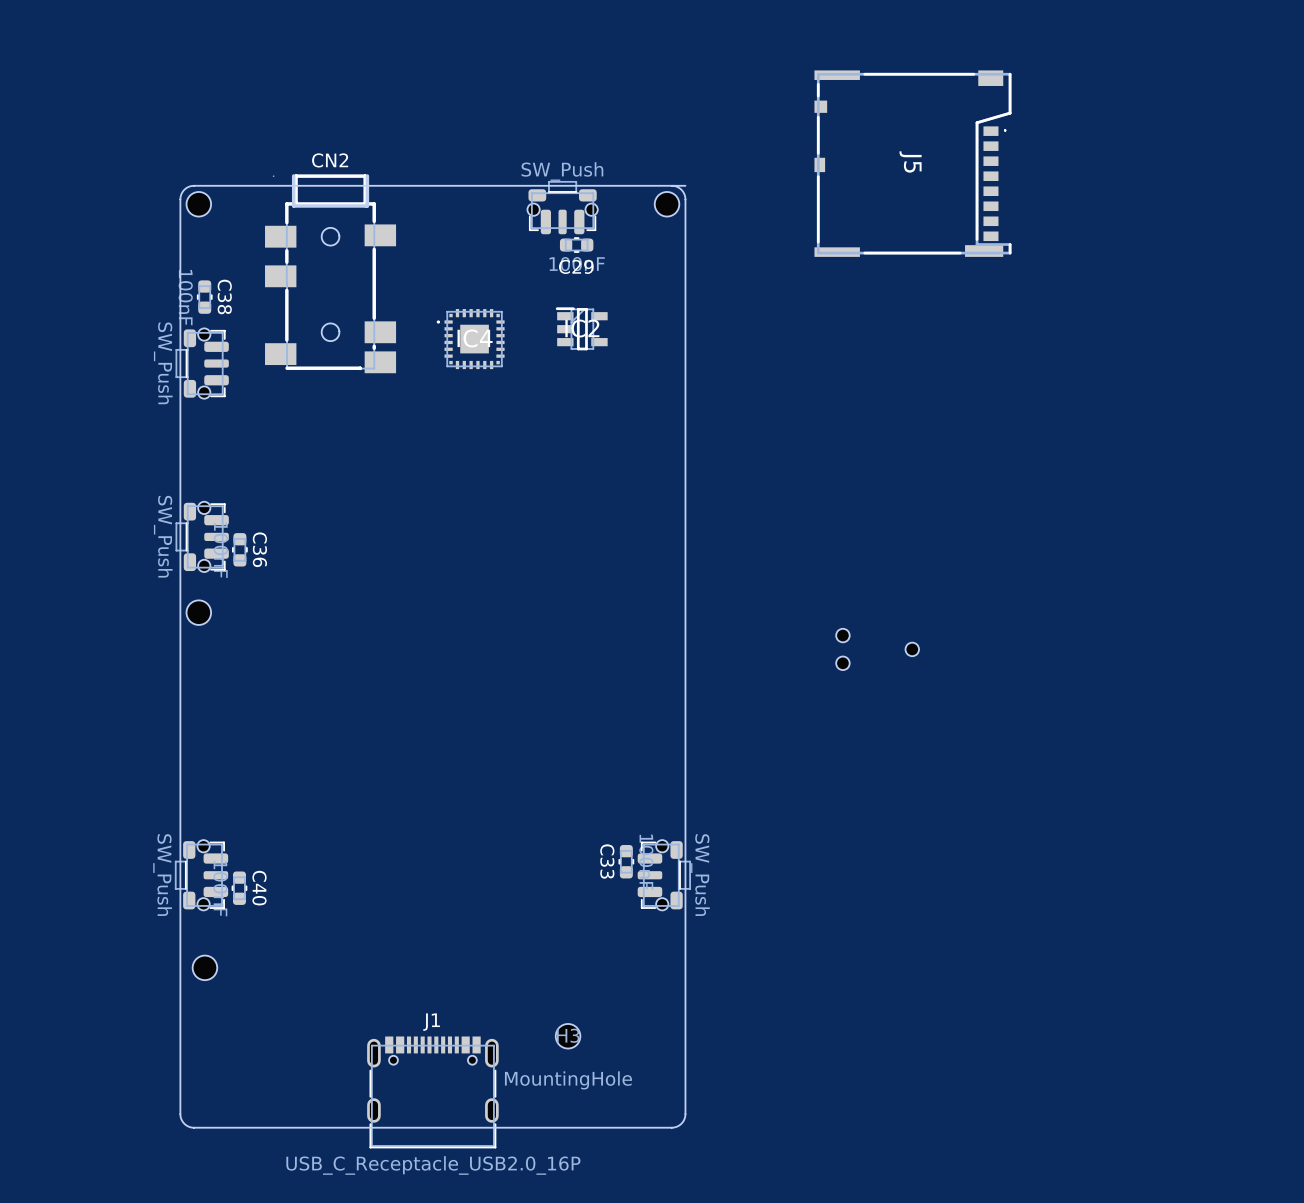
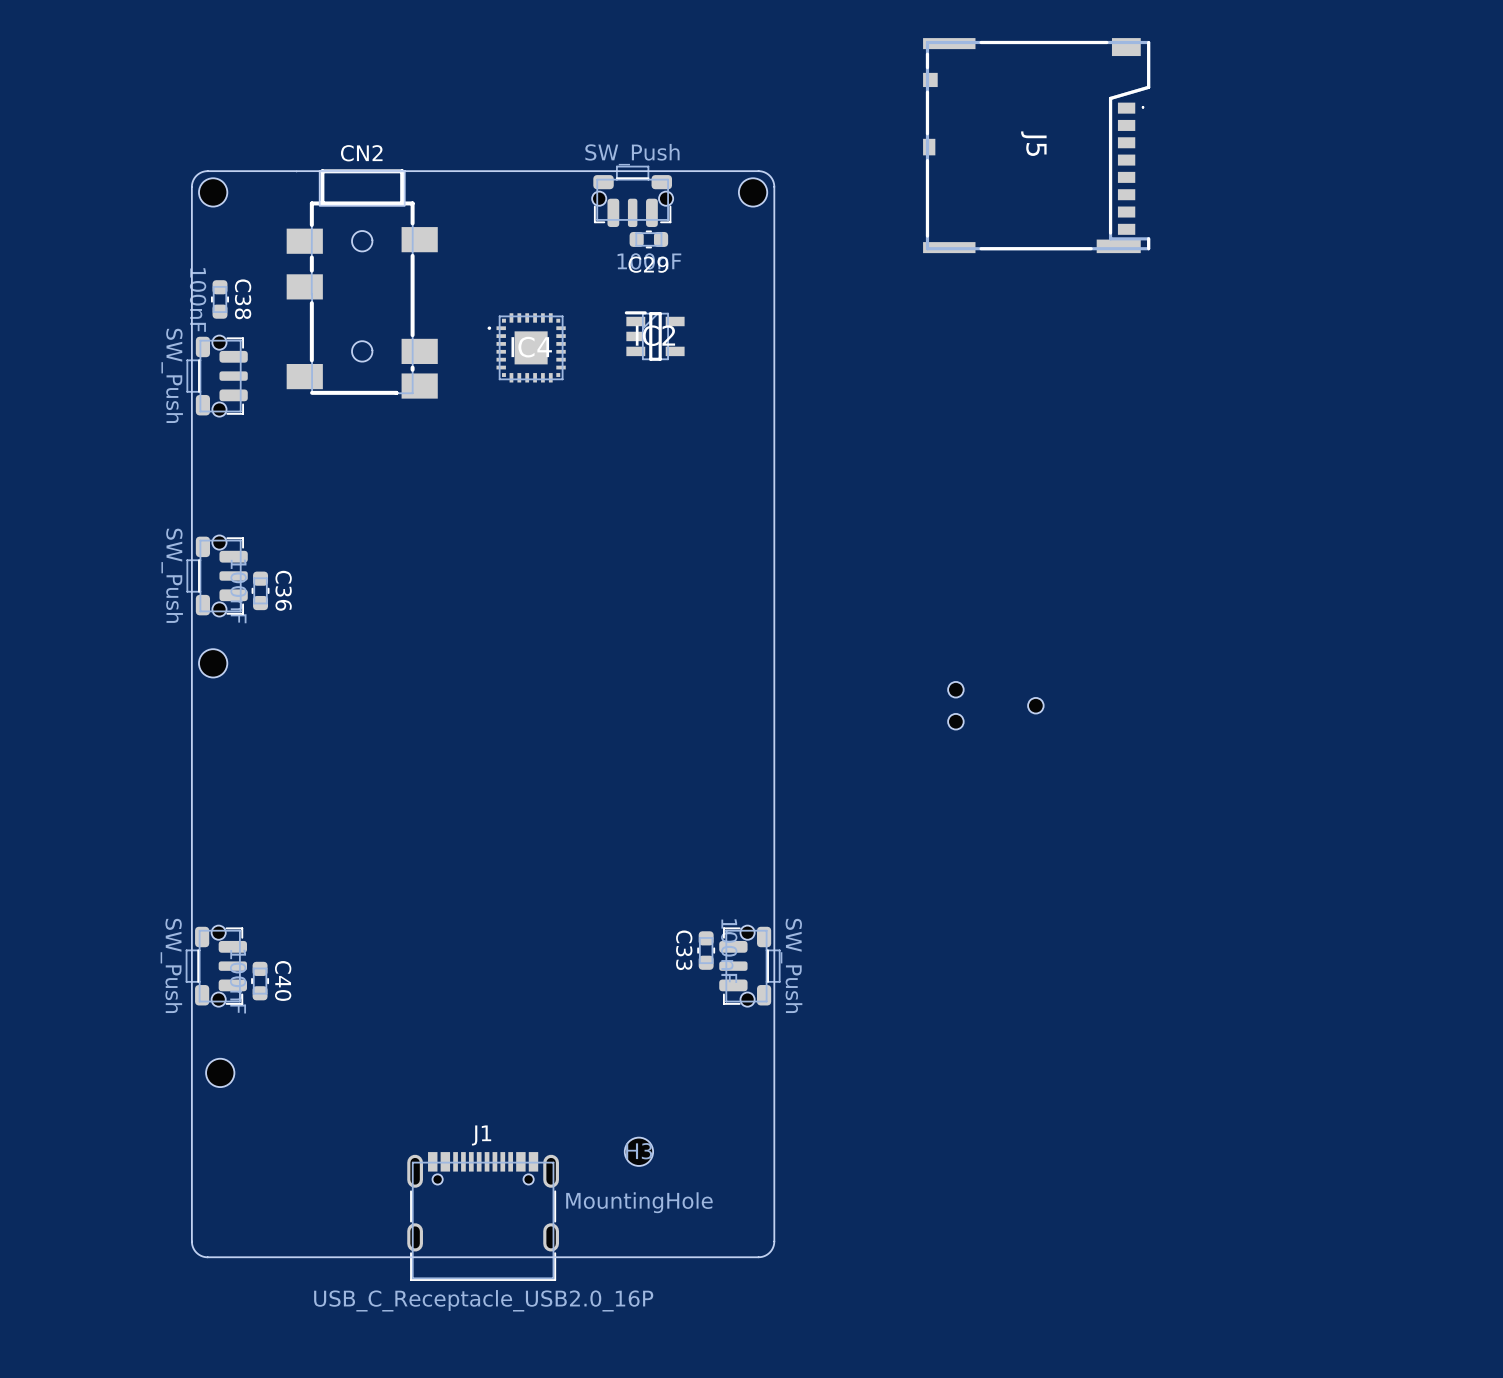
CN2 footprint: [265, 174, 397, 374] -> [286, 169, 438, 399]
board edge: (685, 185) (671, 185) -> none

